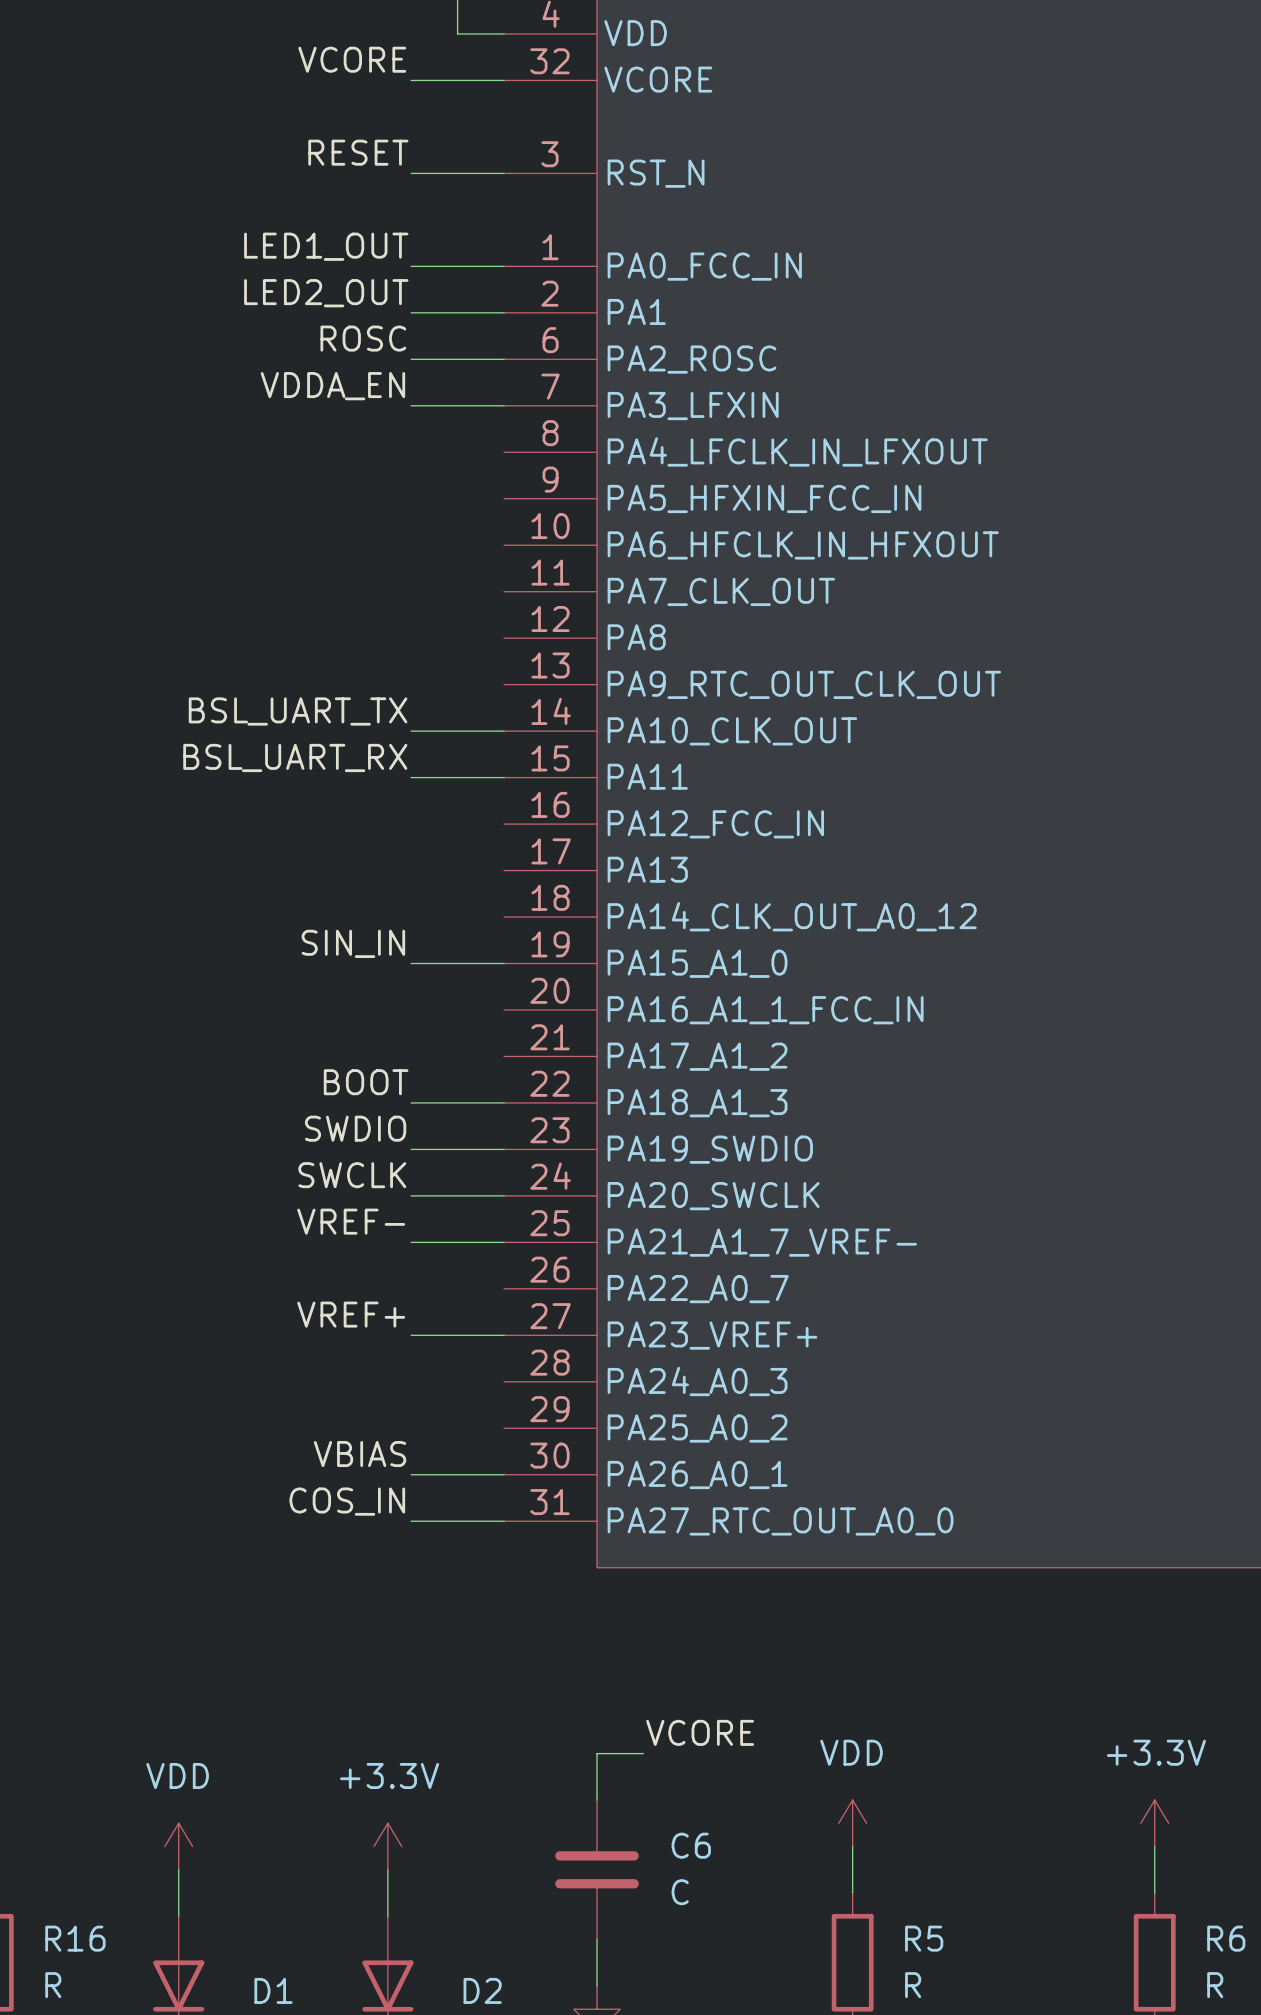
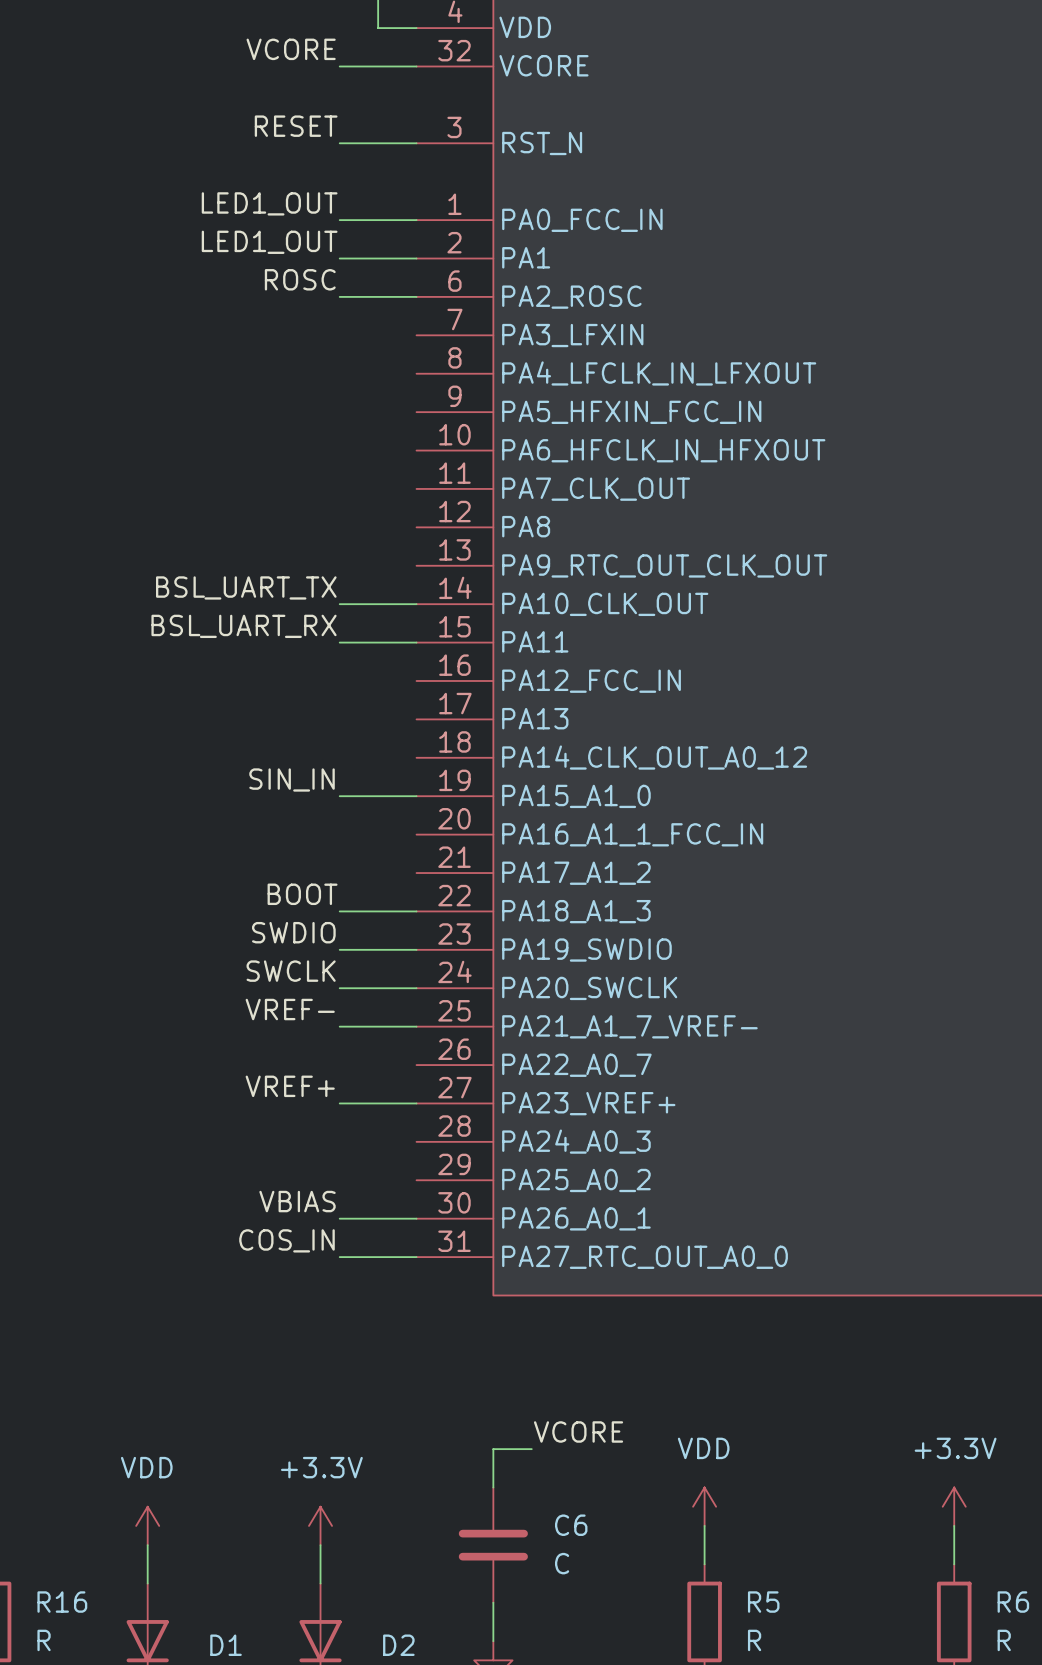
label: LED2_OUT (326, 293) -> LED1_OUT (269, 242)
label: VDDA_EN (332, 386) -> none
wire: (411, 405) (504, 405) -> none

